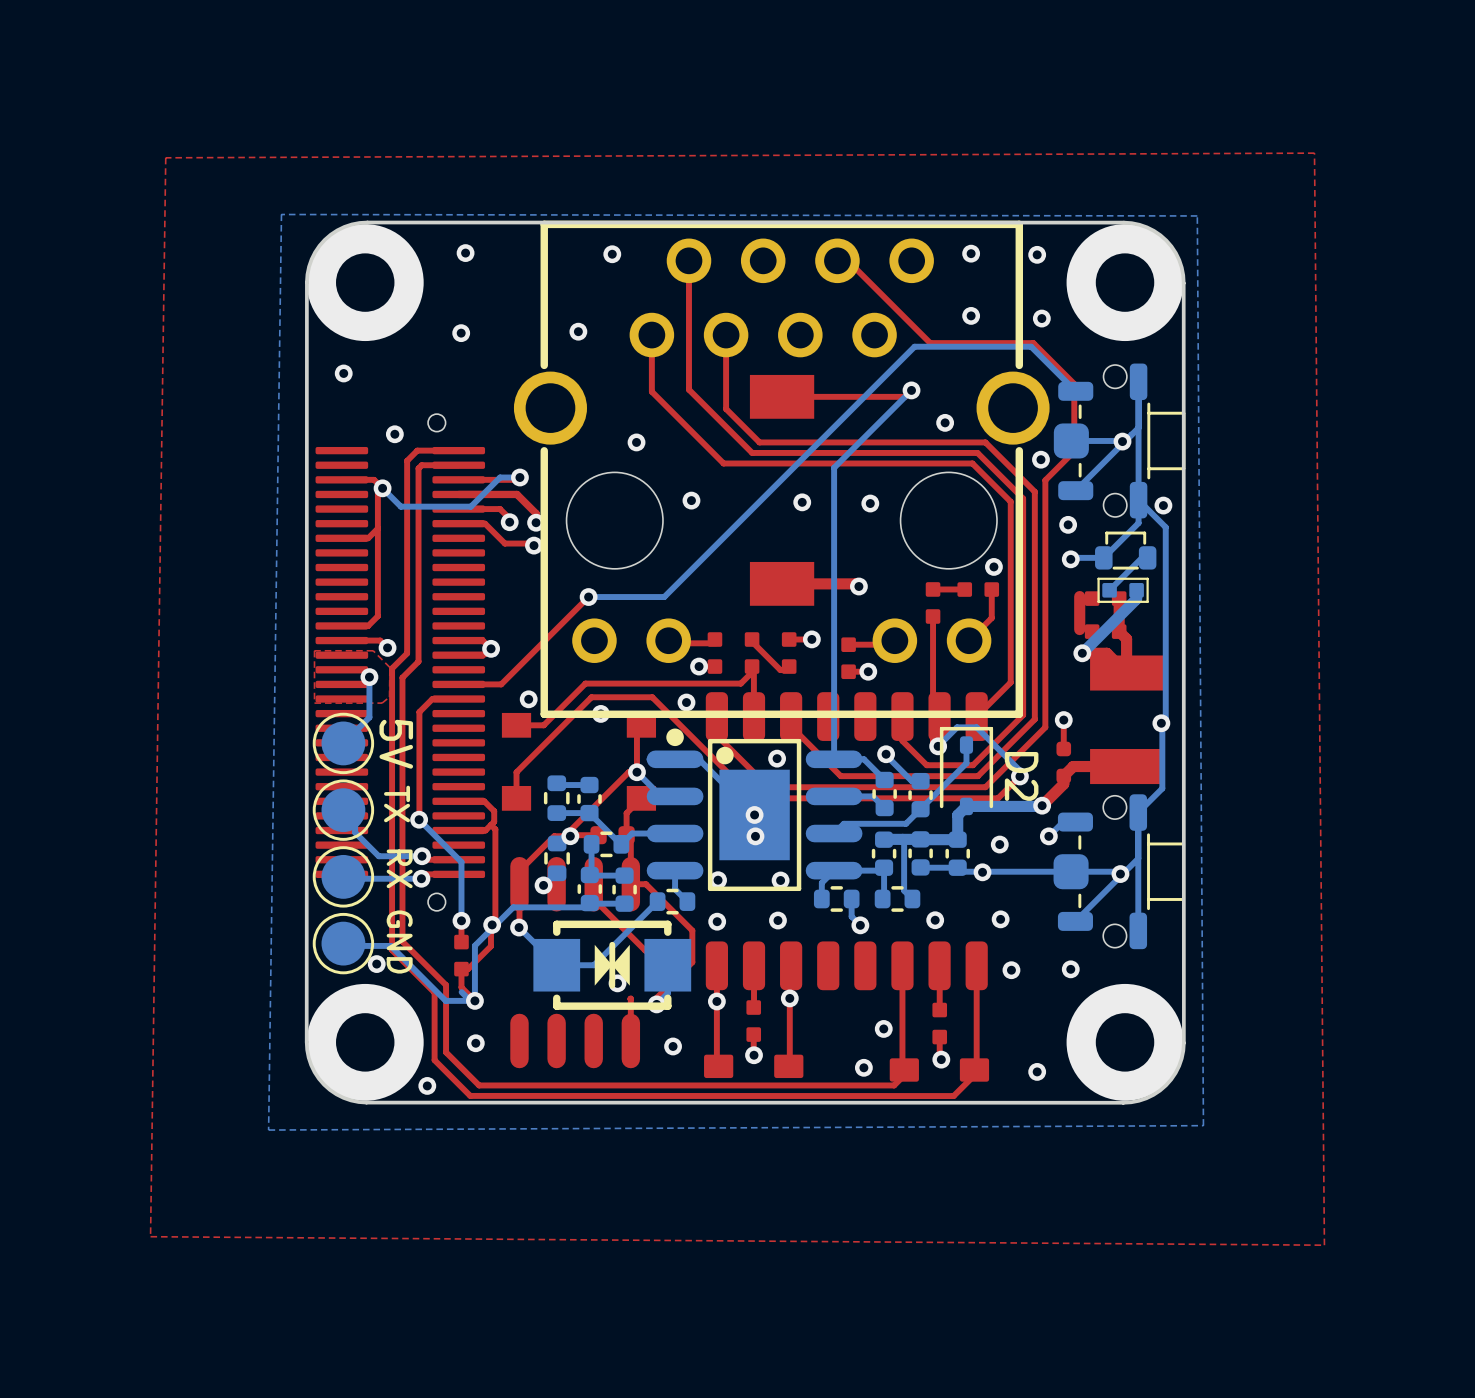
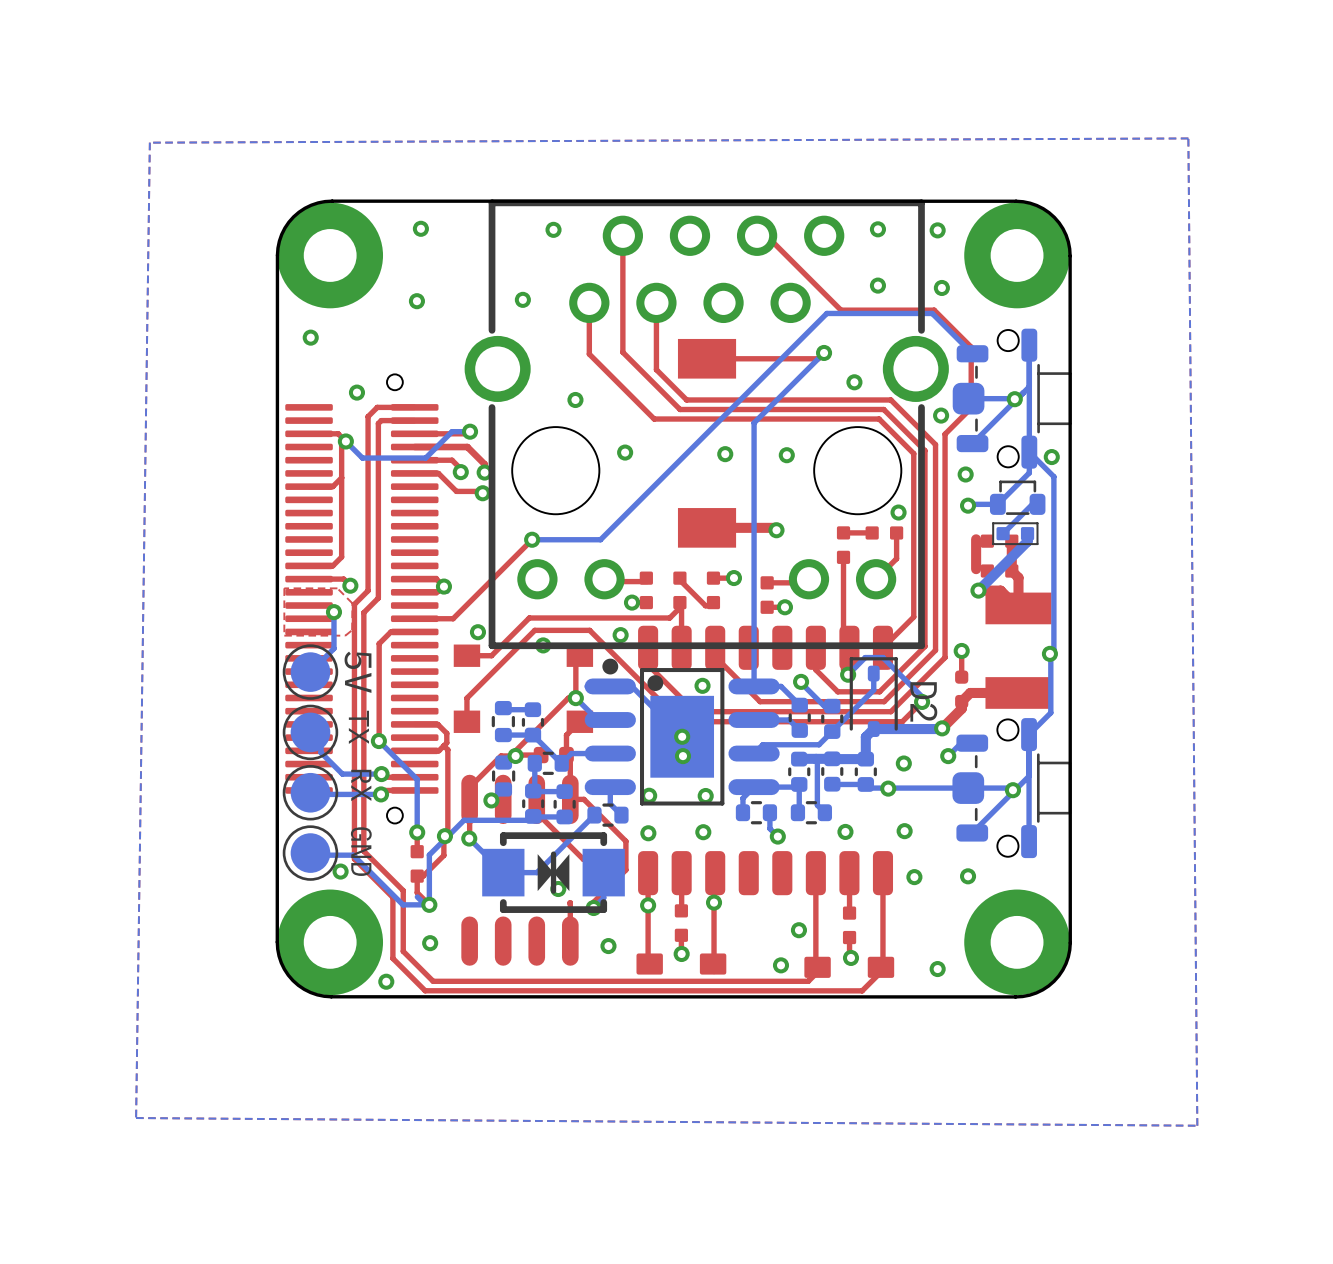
bottom zone outline: (281, 214) (1197, 215) (1203, 1125) (268, 1130) (281, 214) -> (1188, 138) (1197, 1125) (136, 1118) (149, 142) (1188, 138)

